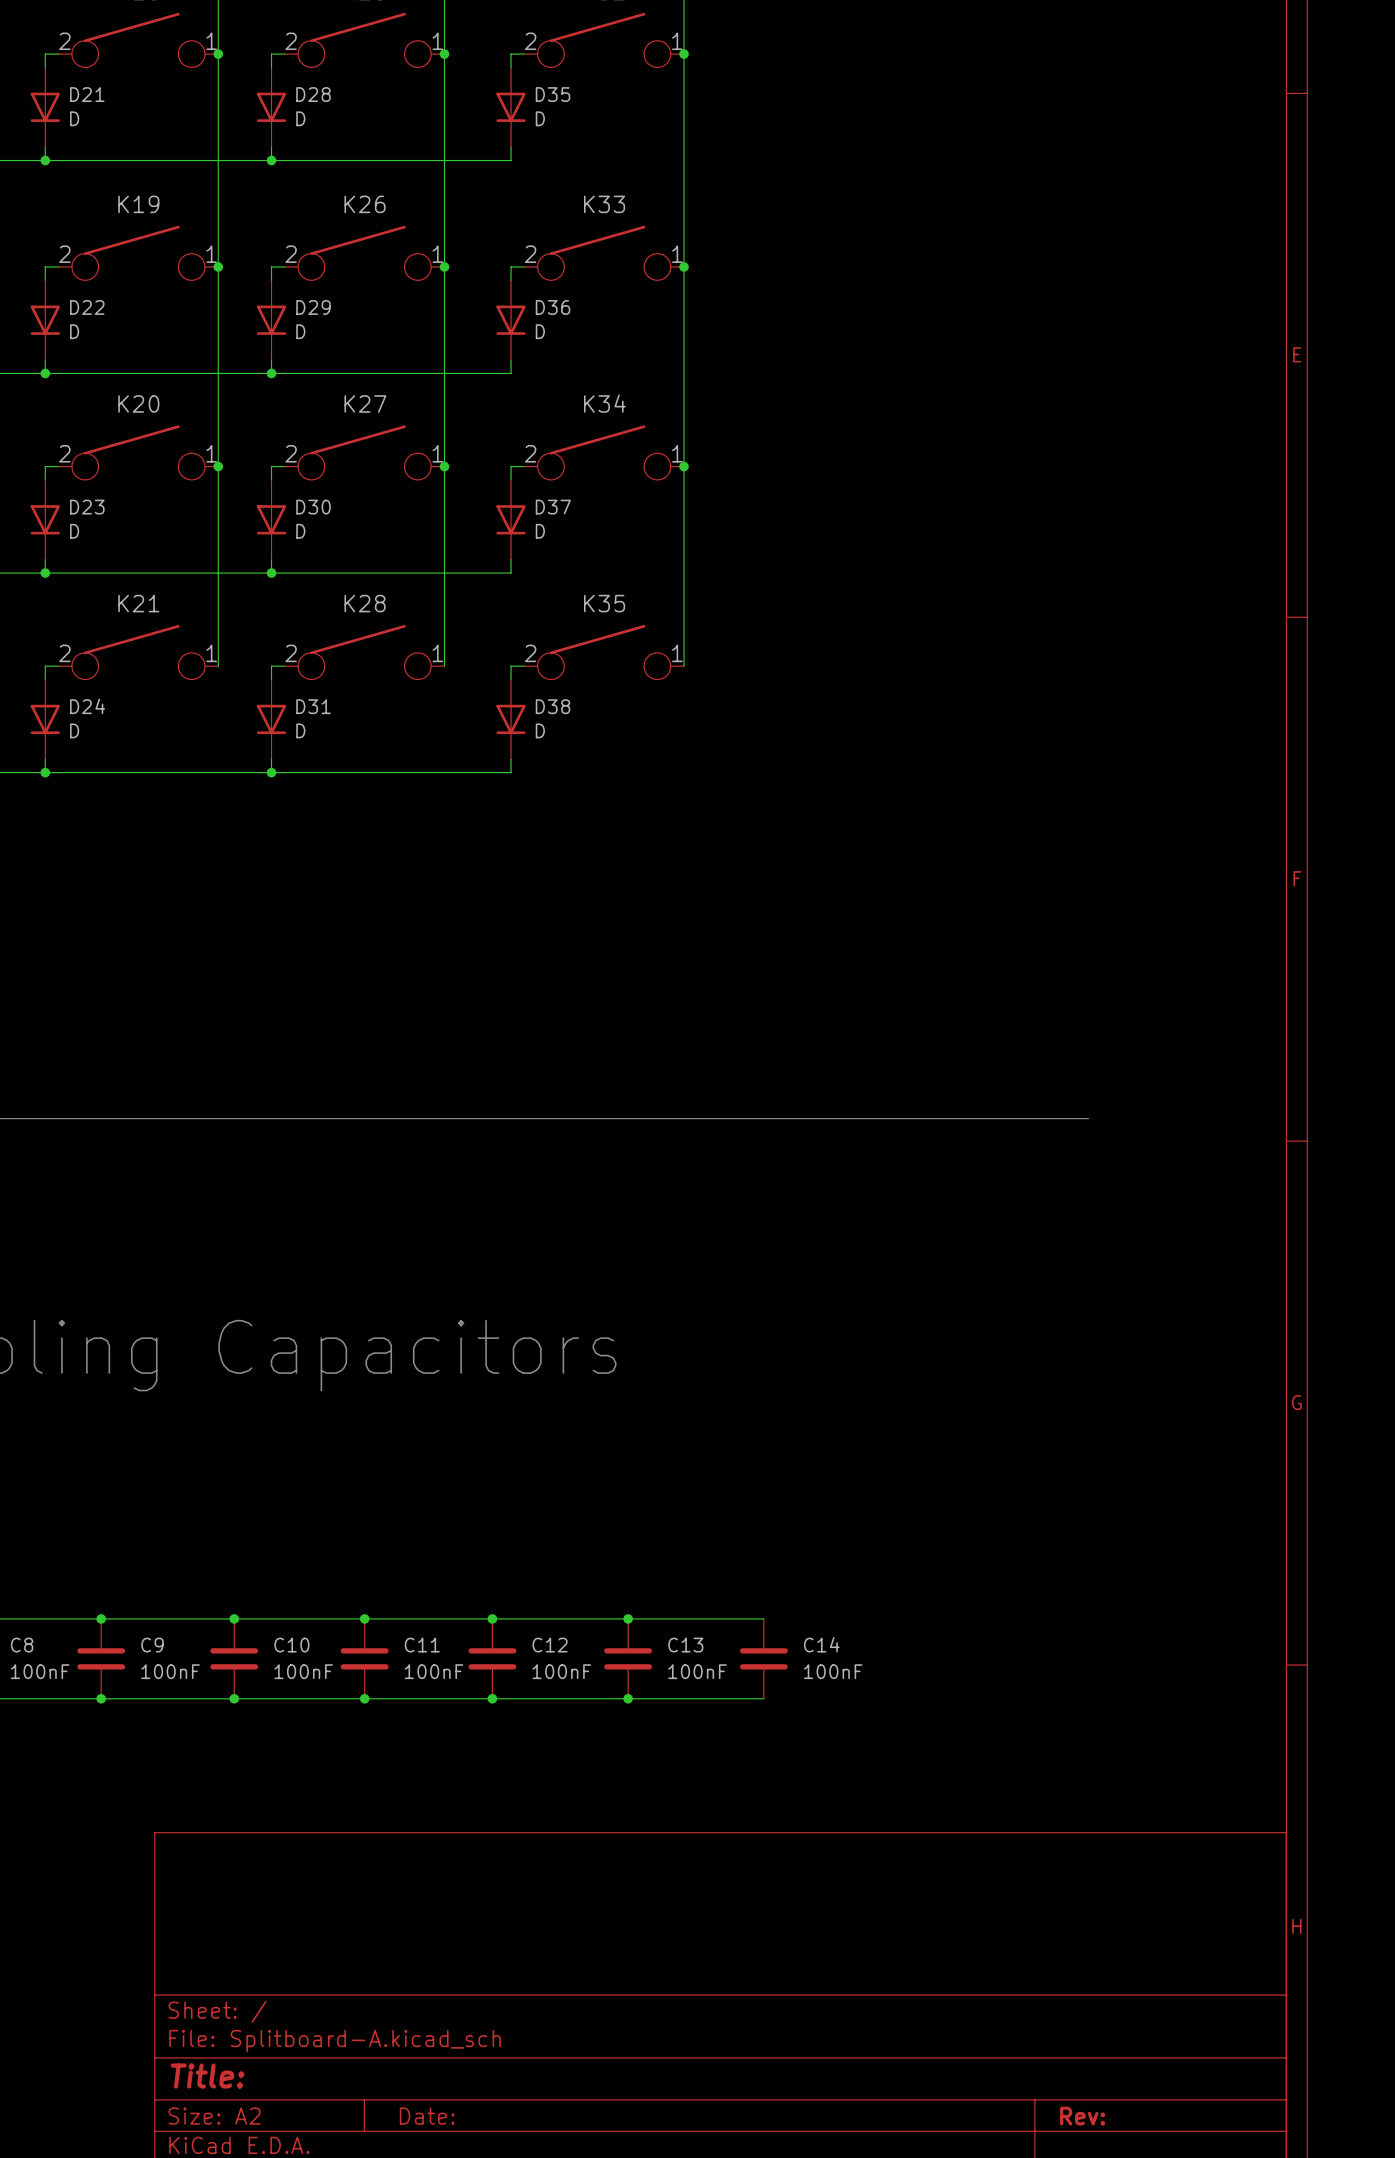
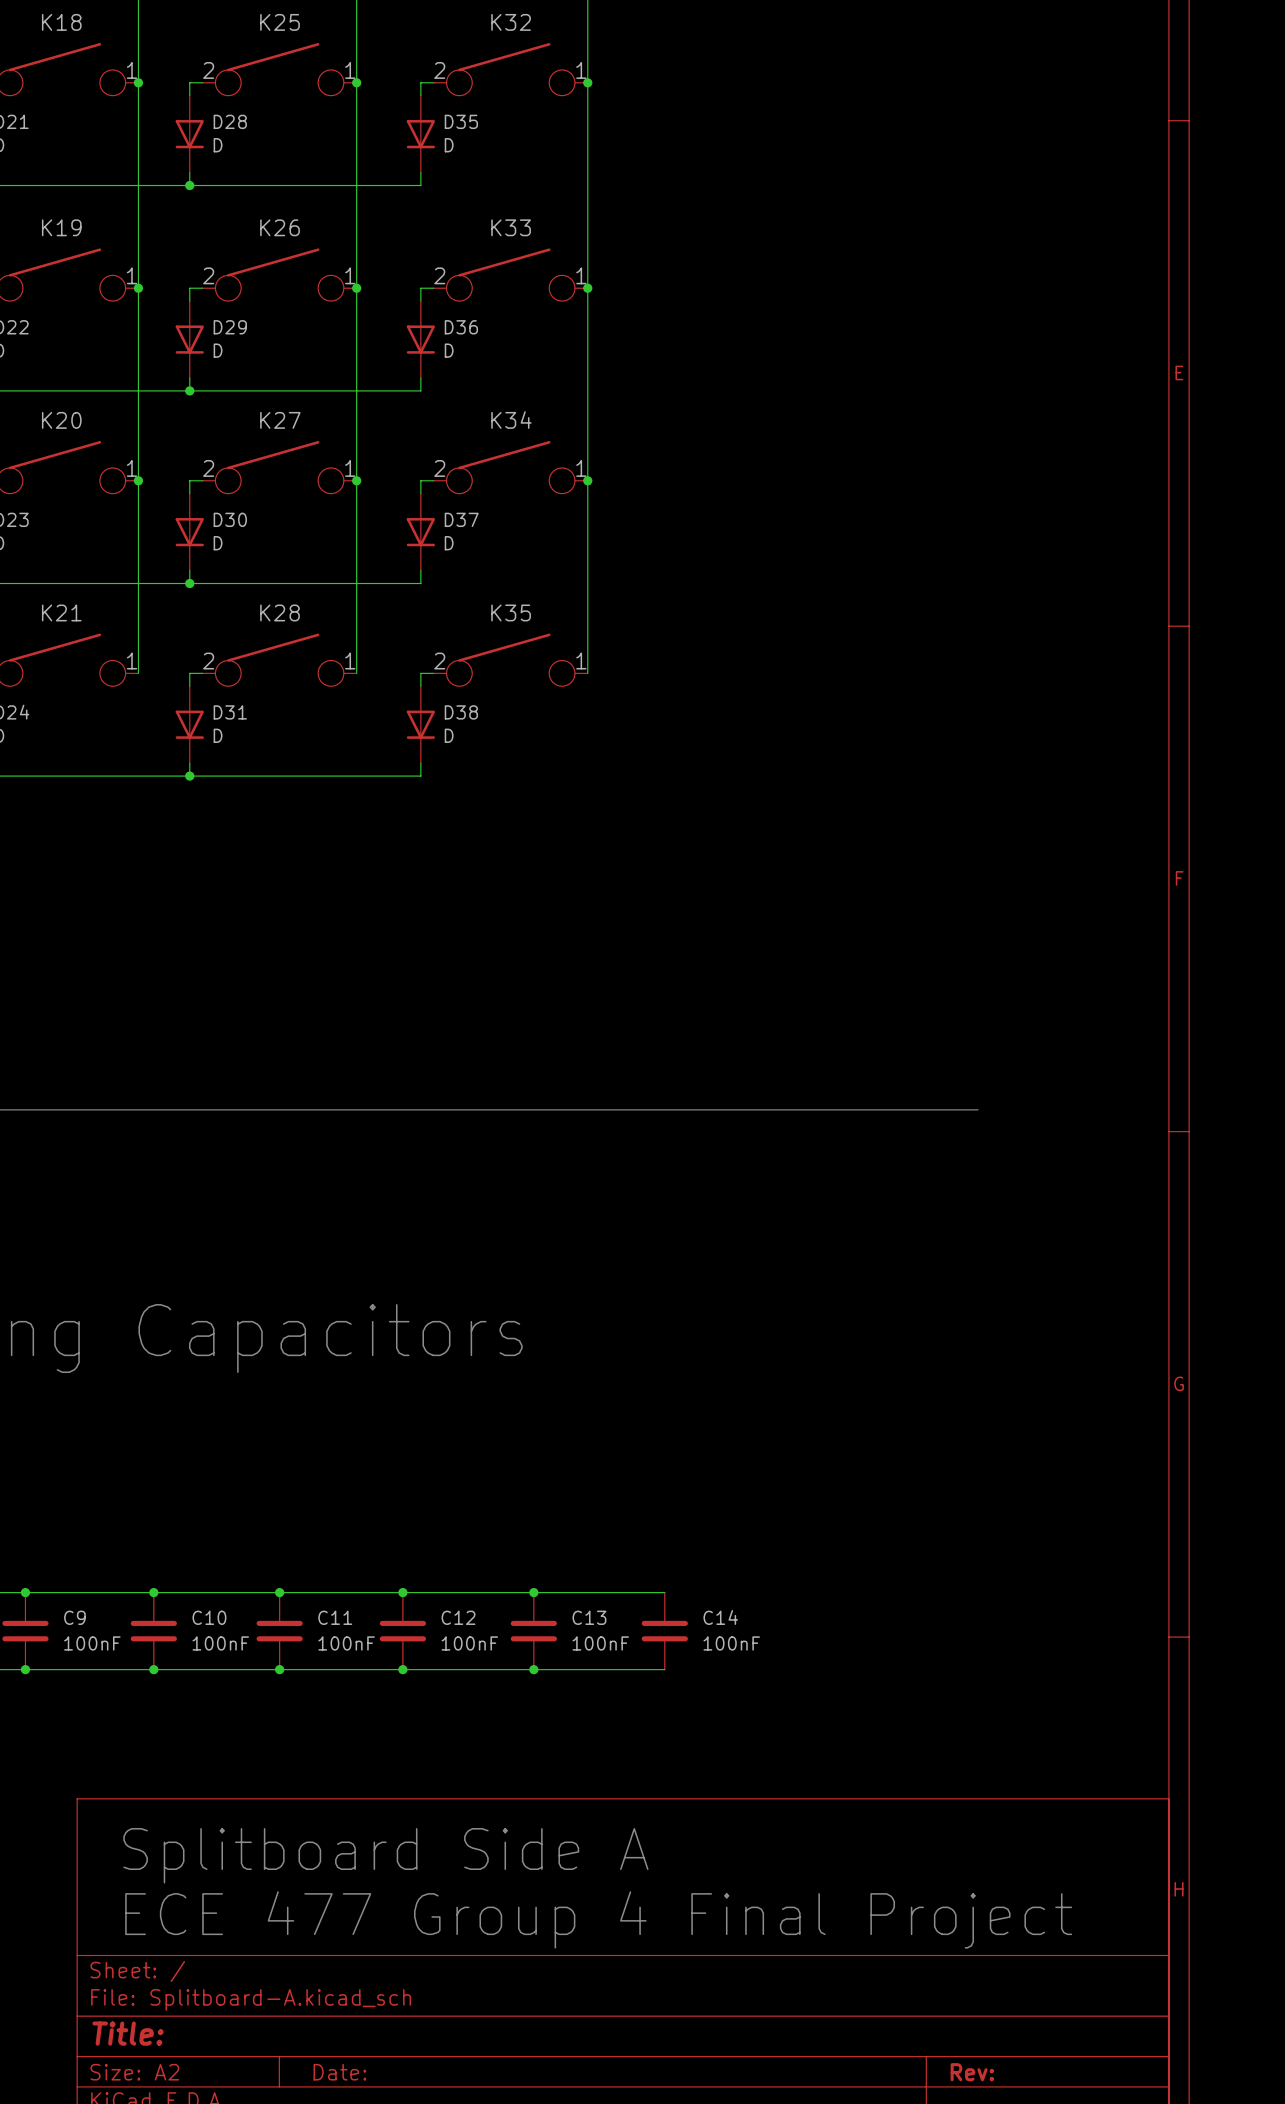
text: none -> Splitboard Side A (385, 1855)
text: none -> ECE 477 Group 4 Final Project (598, 1919)

